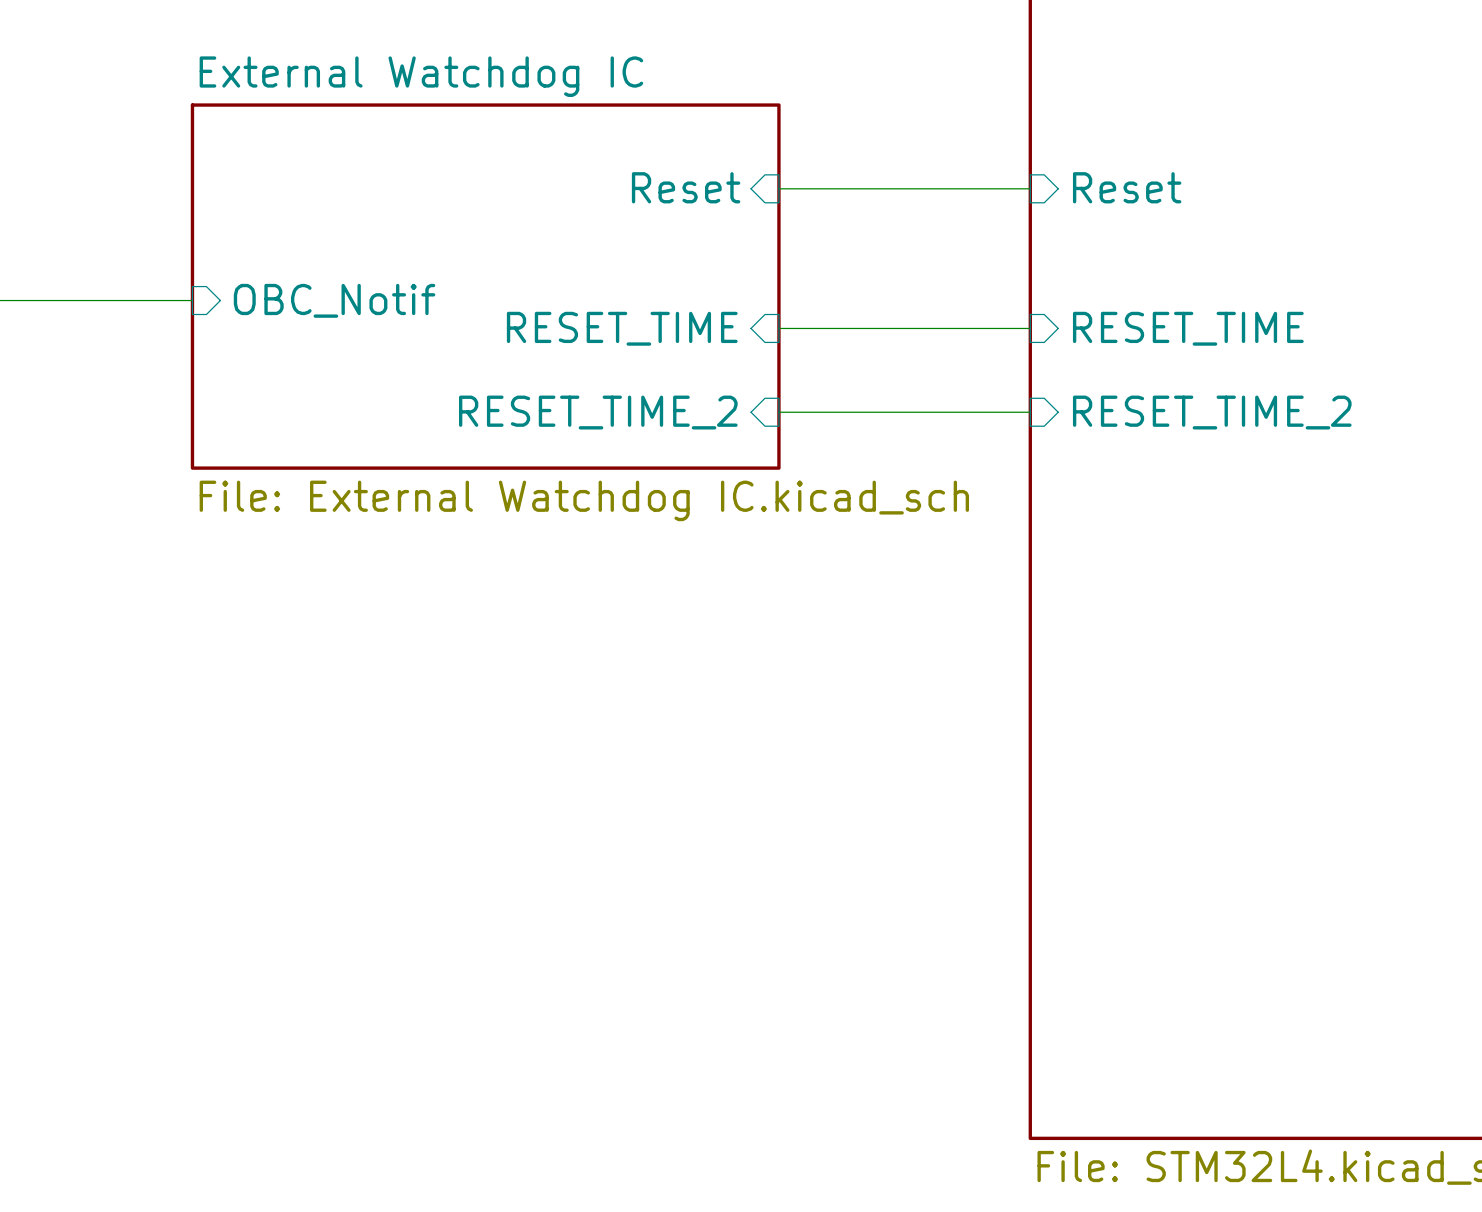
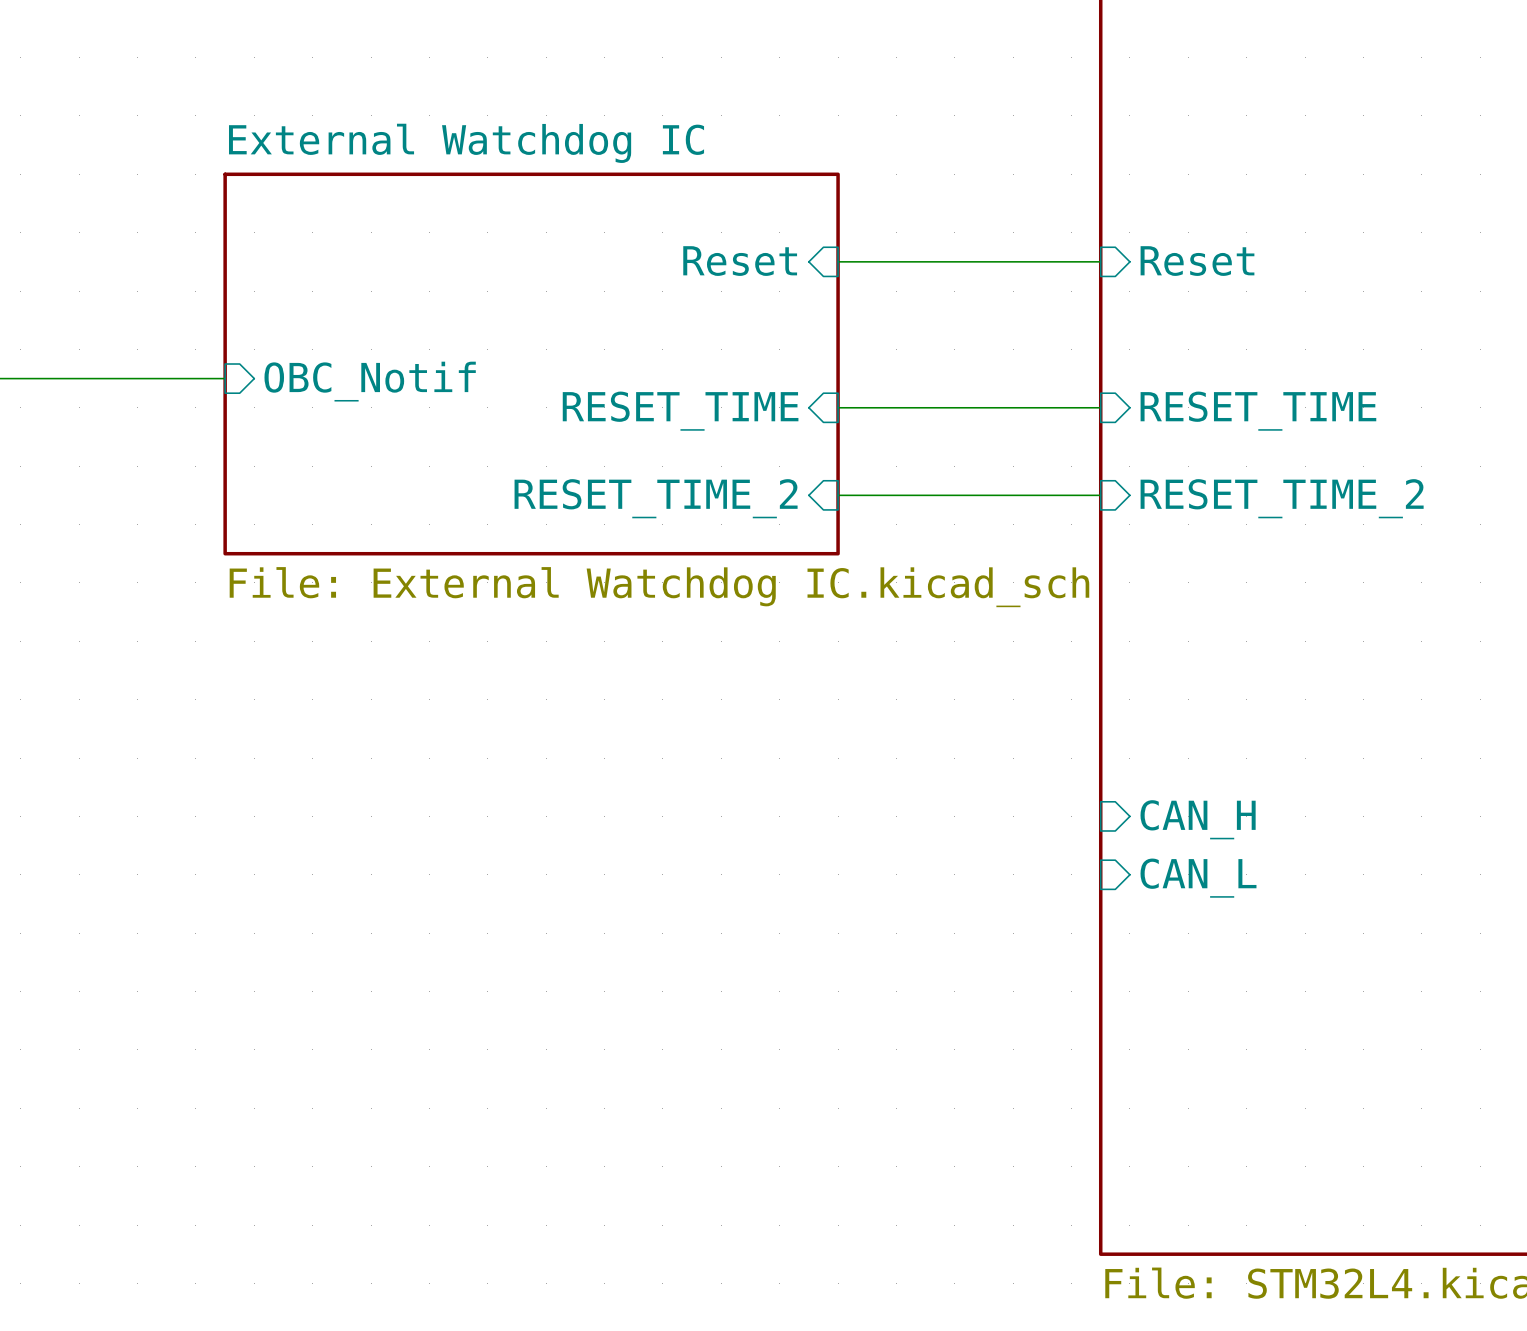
sheet pin: none -> CAN_H (1198, 819)
sheet pin: none -> CAN_L (1198, 878)

